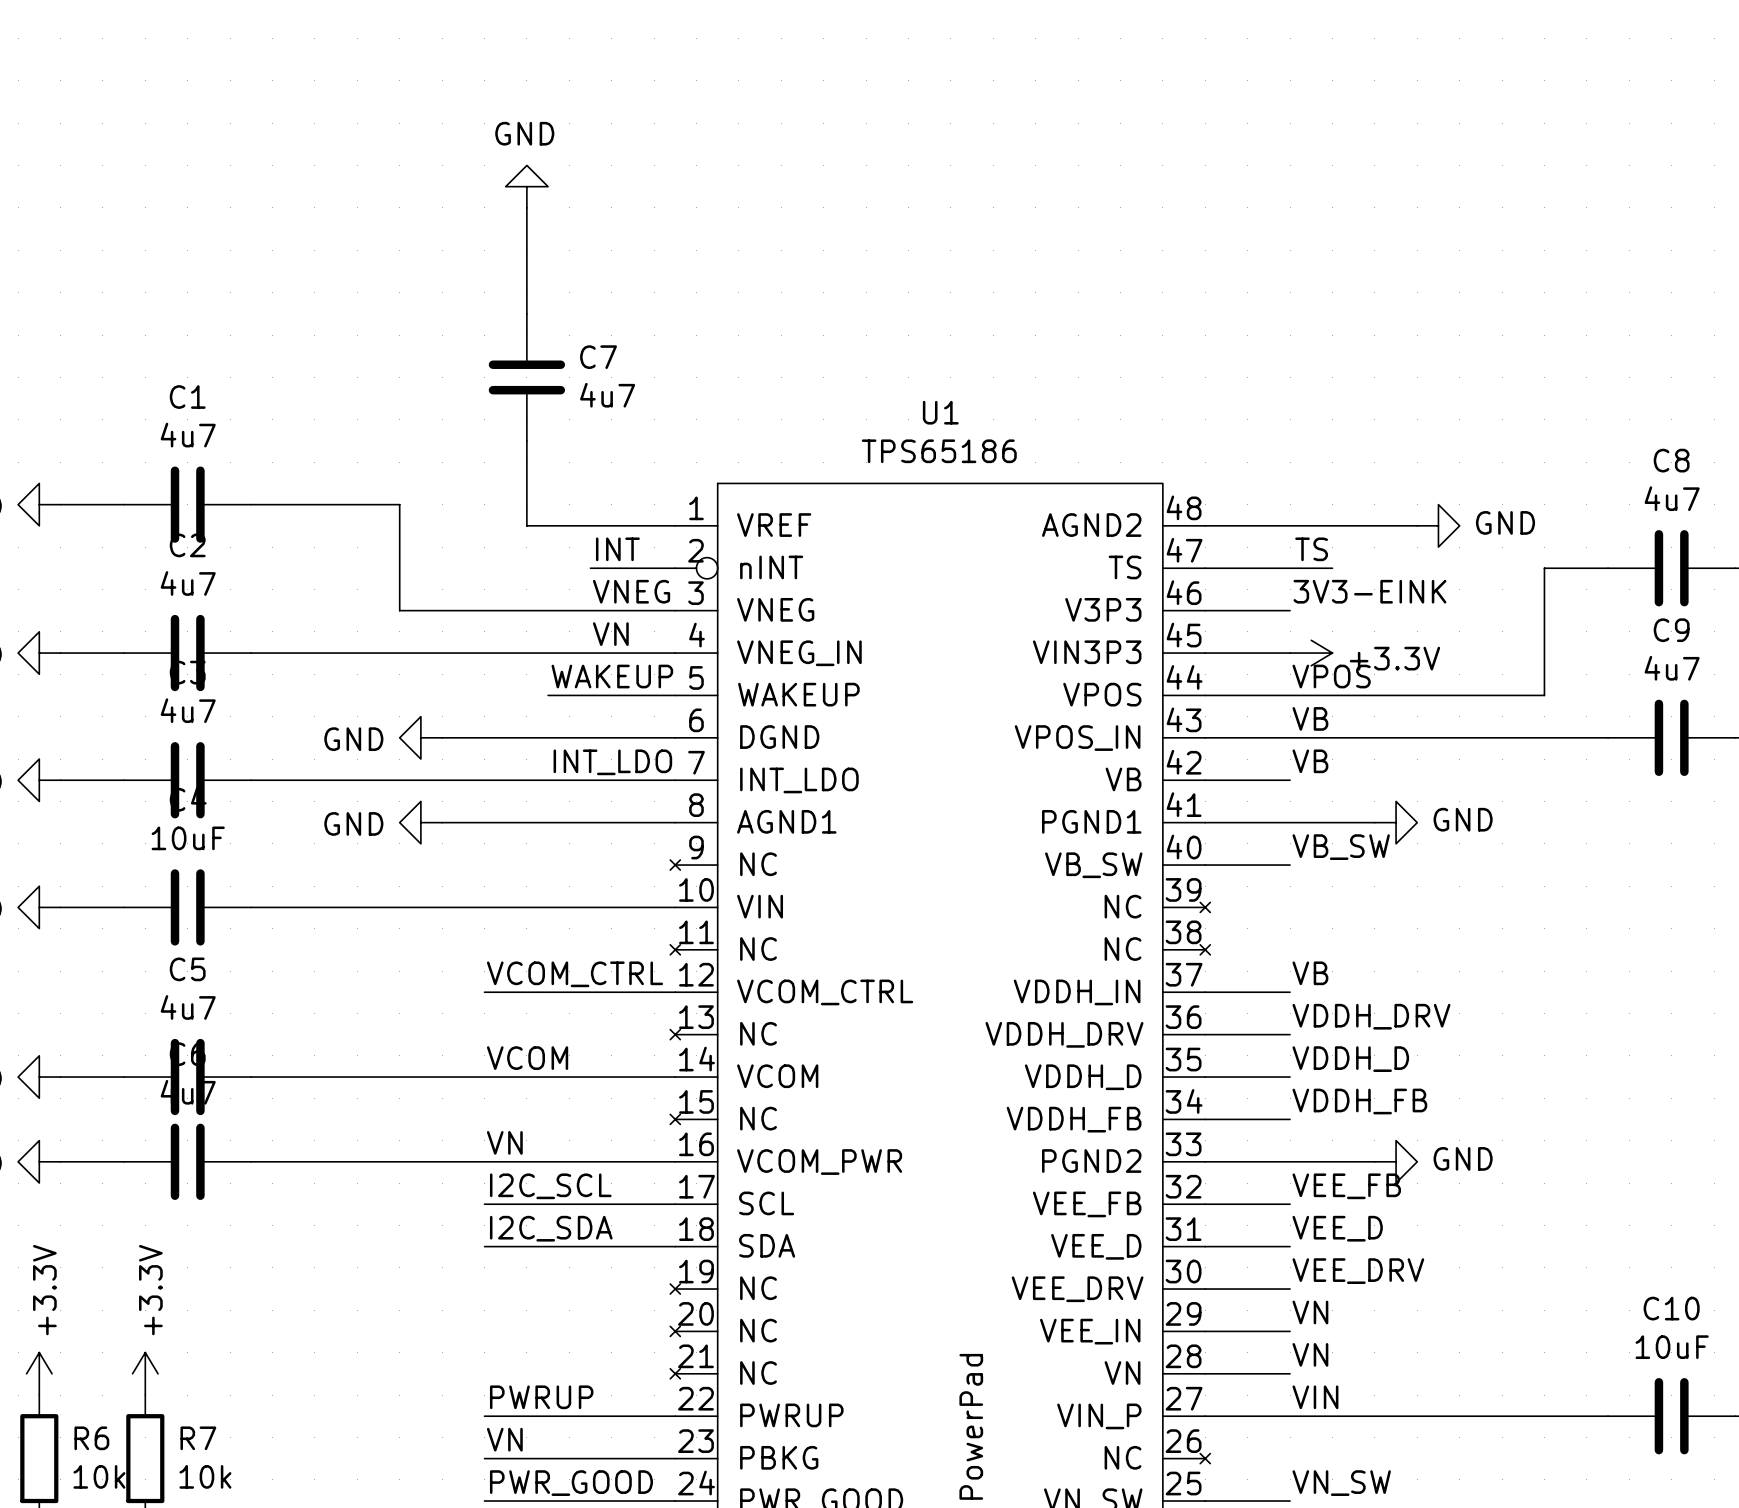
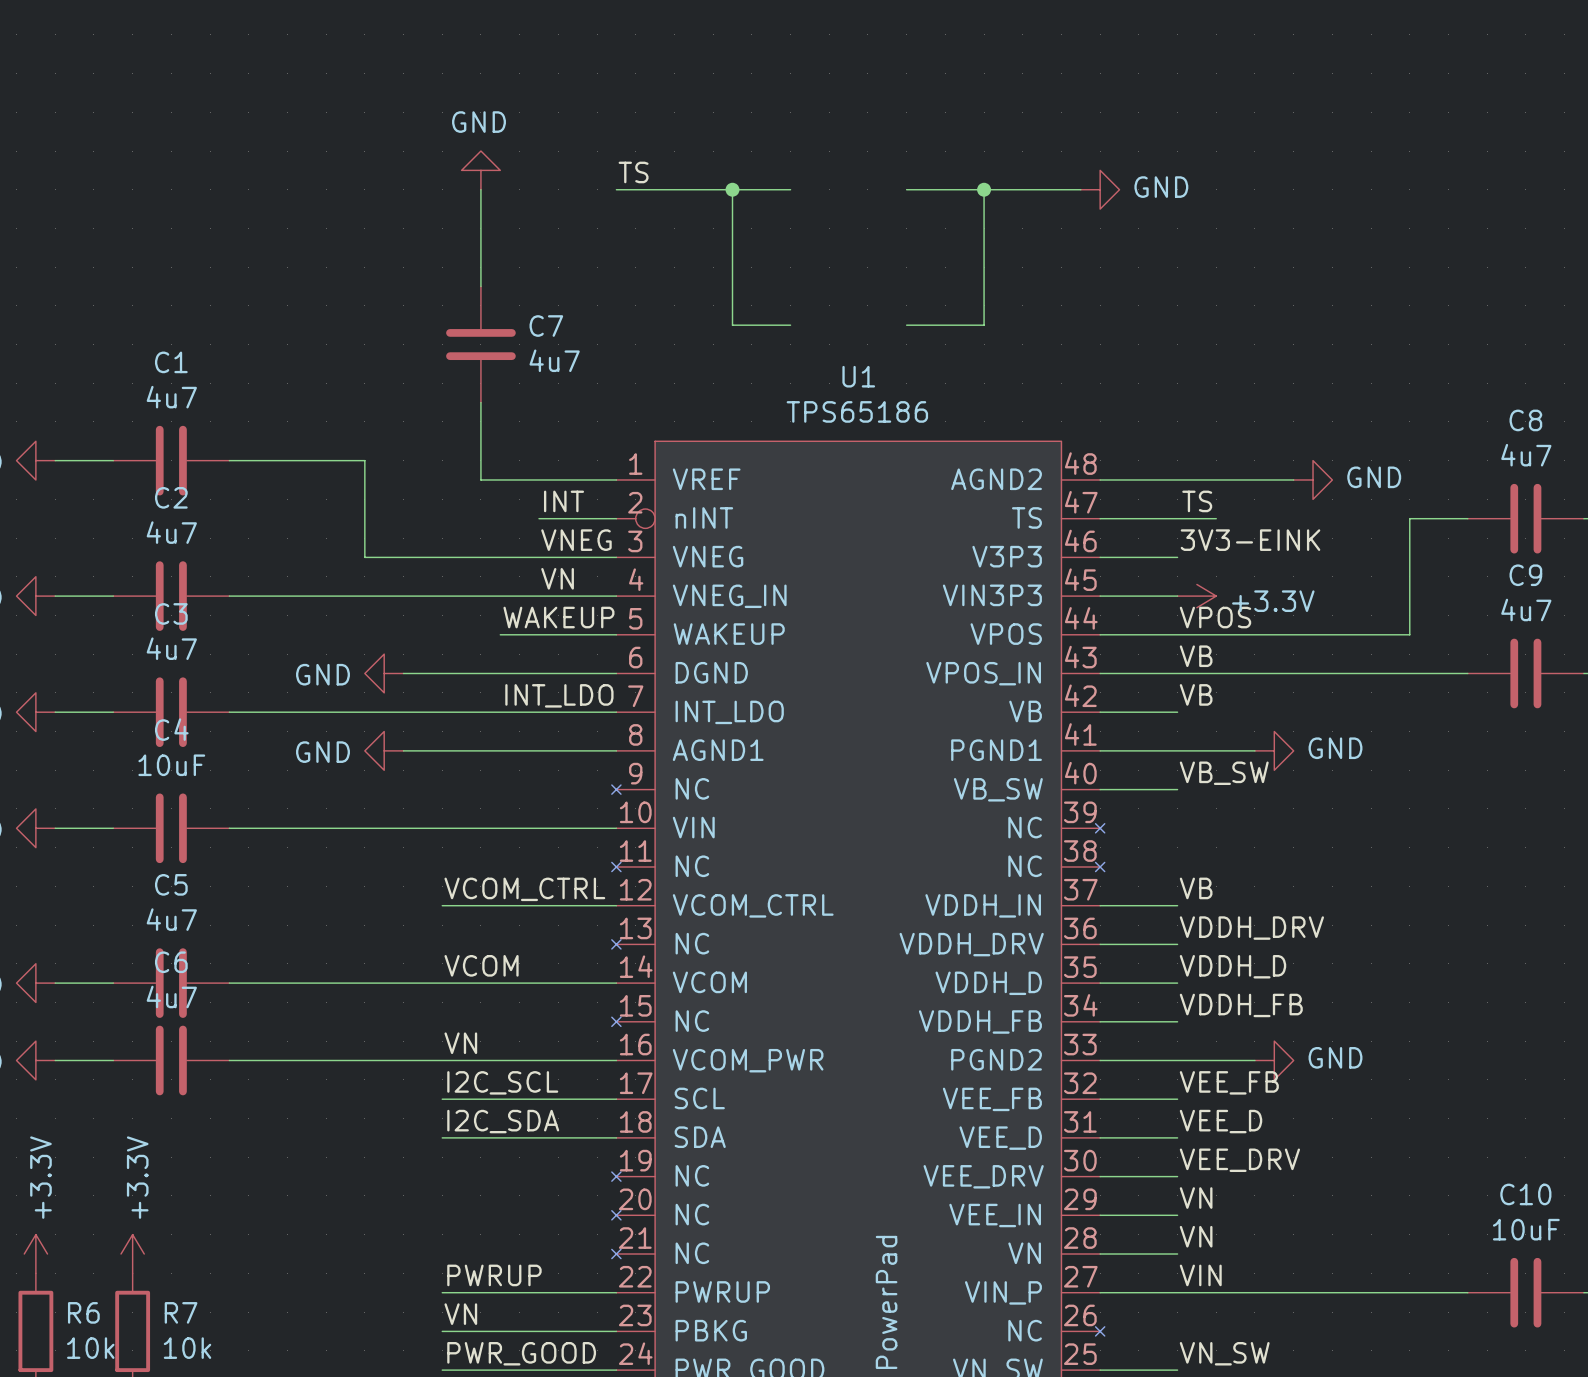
label: none -> TS (633, 172)
wire: none -> (616, 189) (790, 189)
wire: none -> (732, 189) (732, 325) (790, 325)
junction: none -> (732, 189)
wire: none -> (906, 189) (1080, 189)
wire: none -> (984, 189) (984, 325) (906, 325)
junction: none -> (984, 189)
power symbol: none -> GND (1100, 189)

